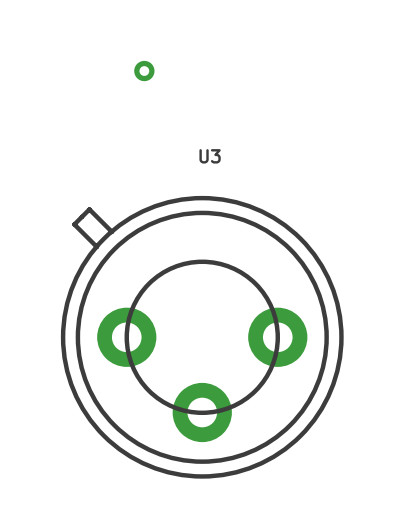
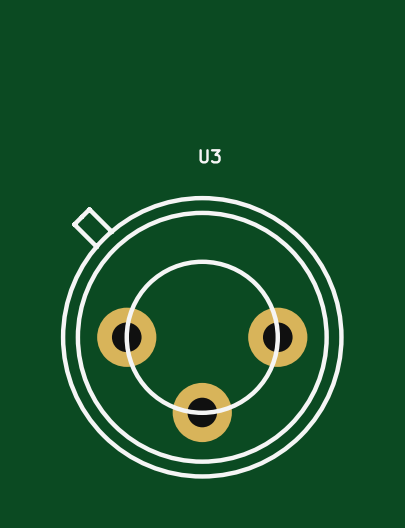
via: (144, 71) -> none

